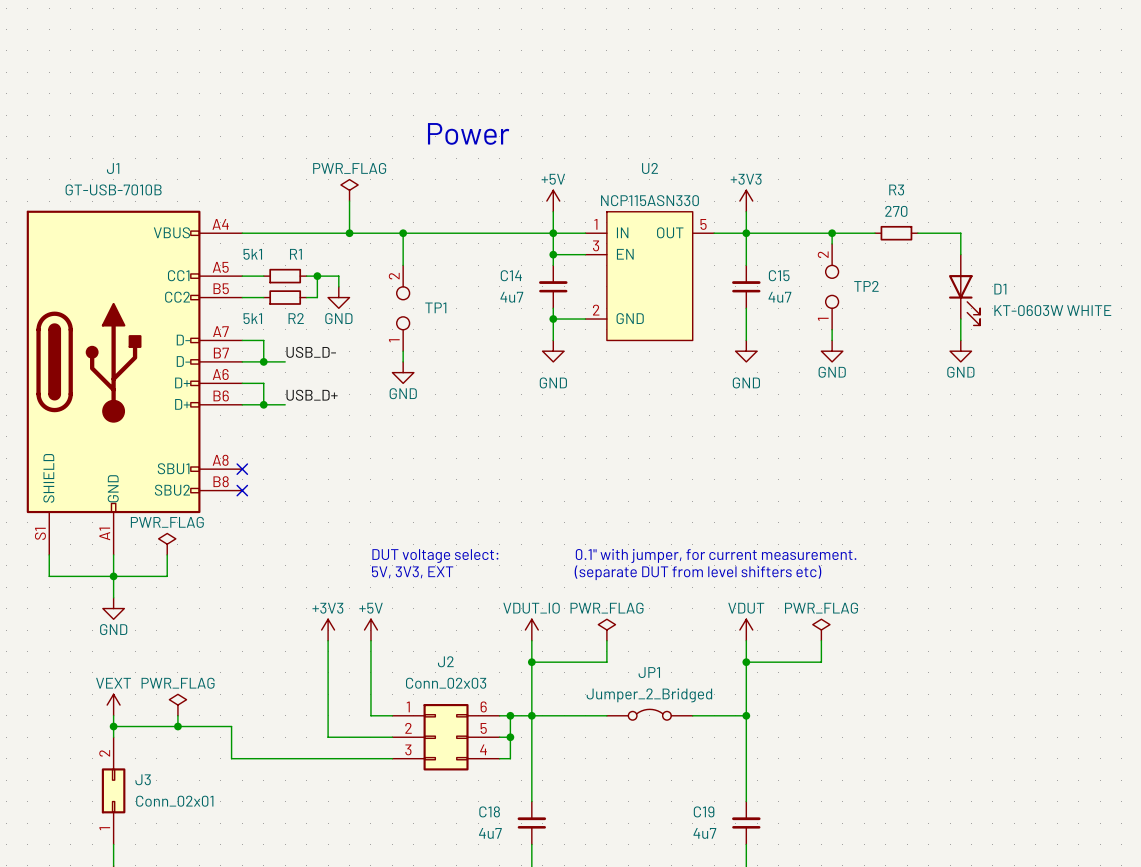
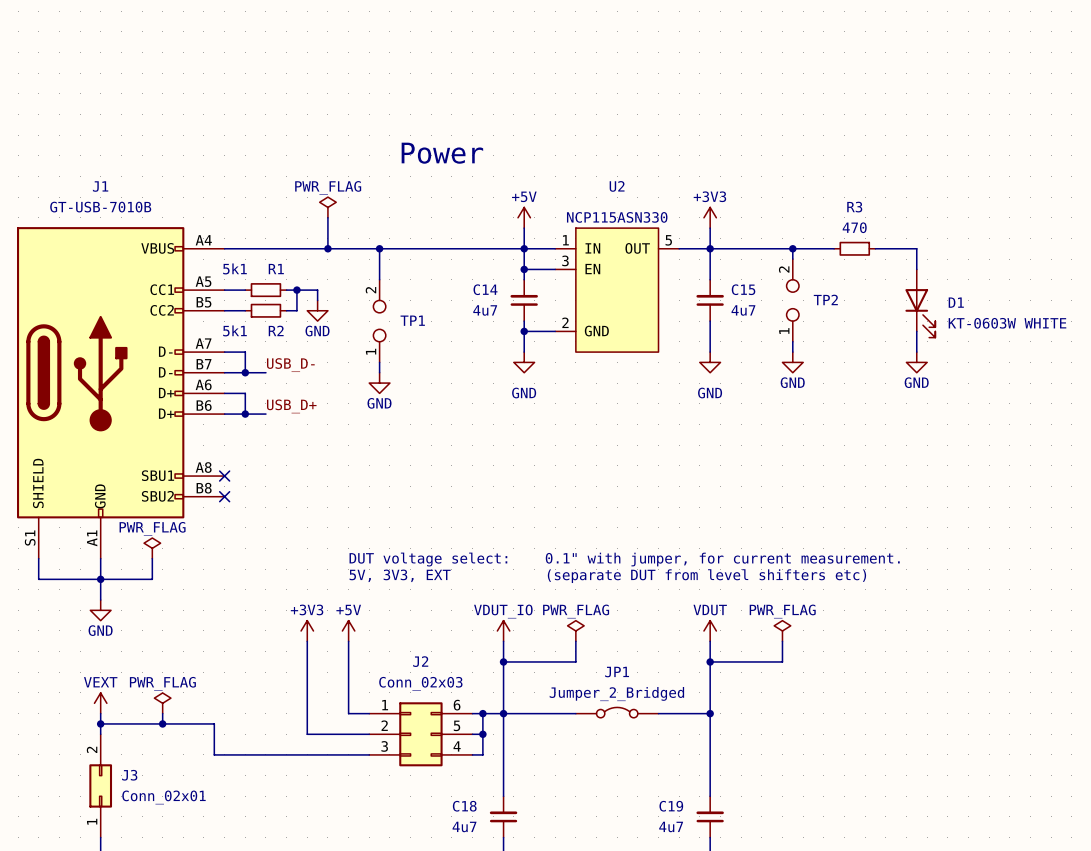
R3 value: 270 (896, 211) -> 470 (854, 227)

